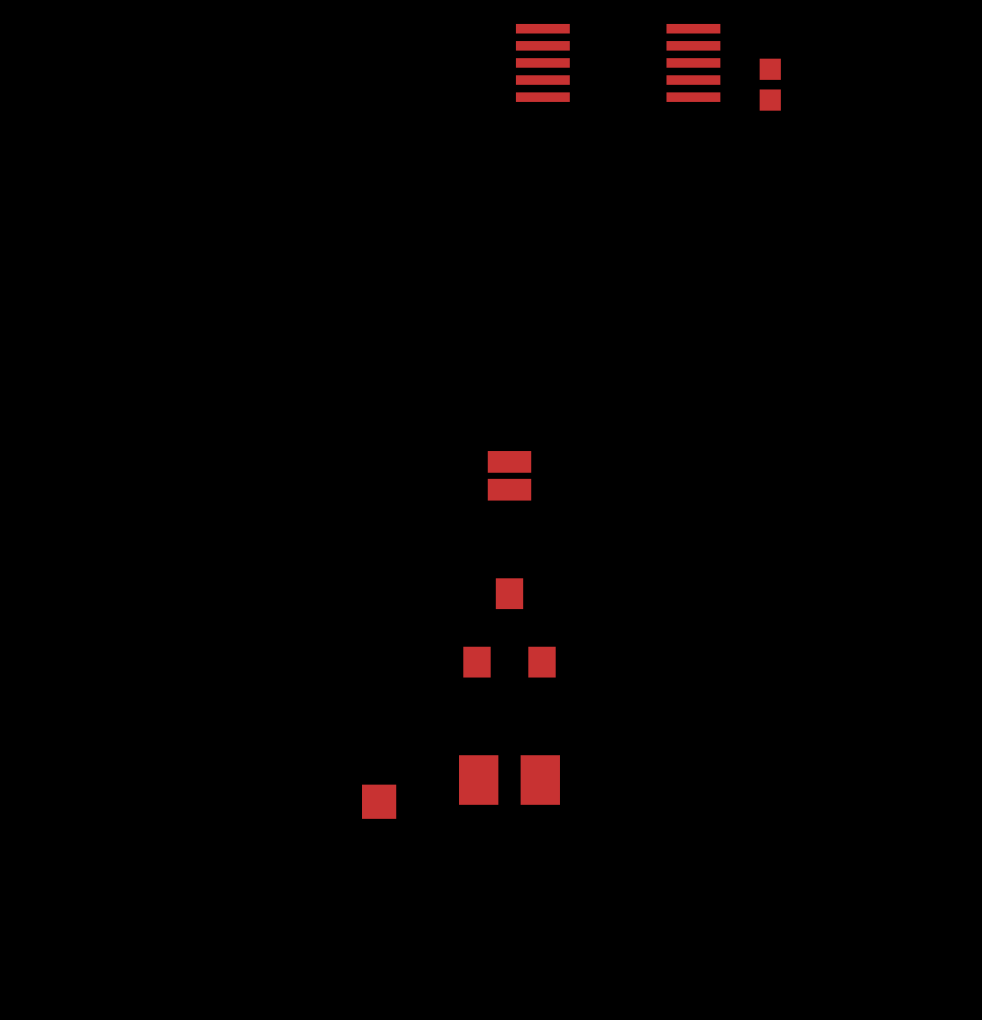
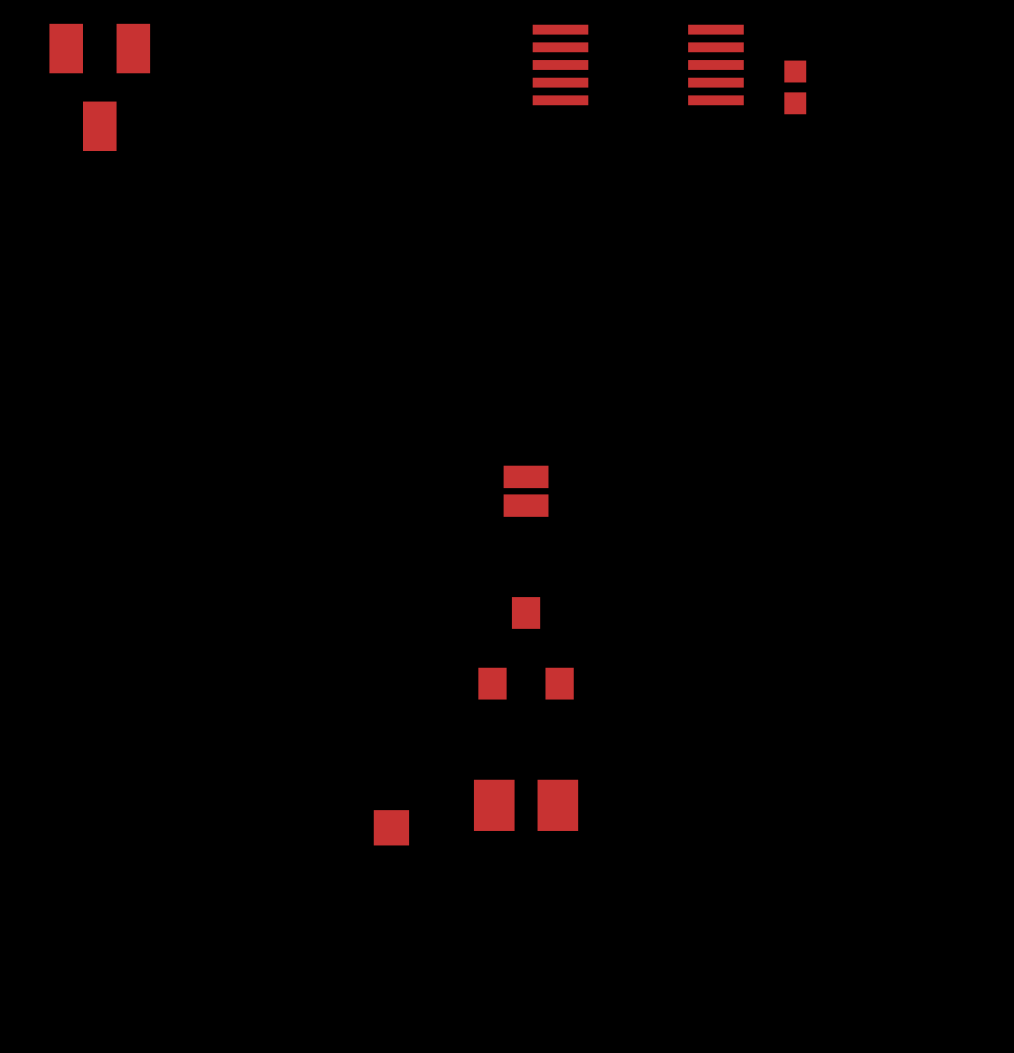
part: none -> (99, 87)

